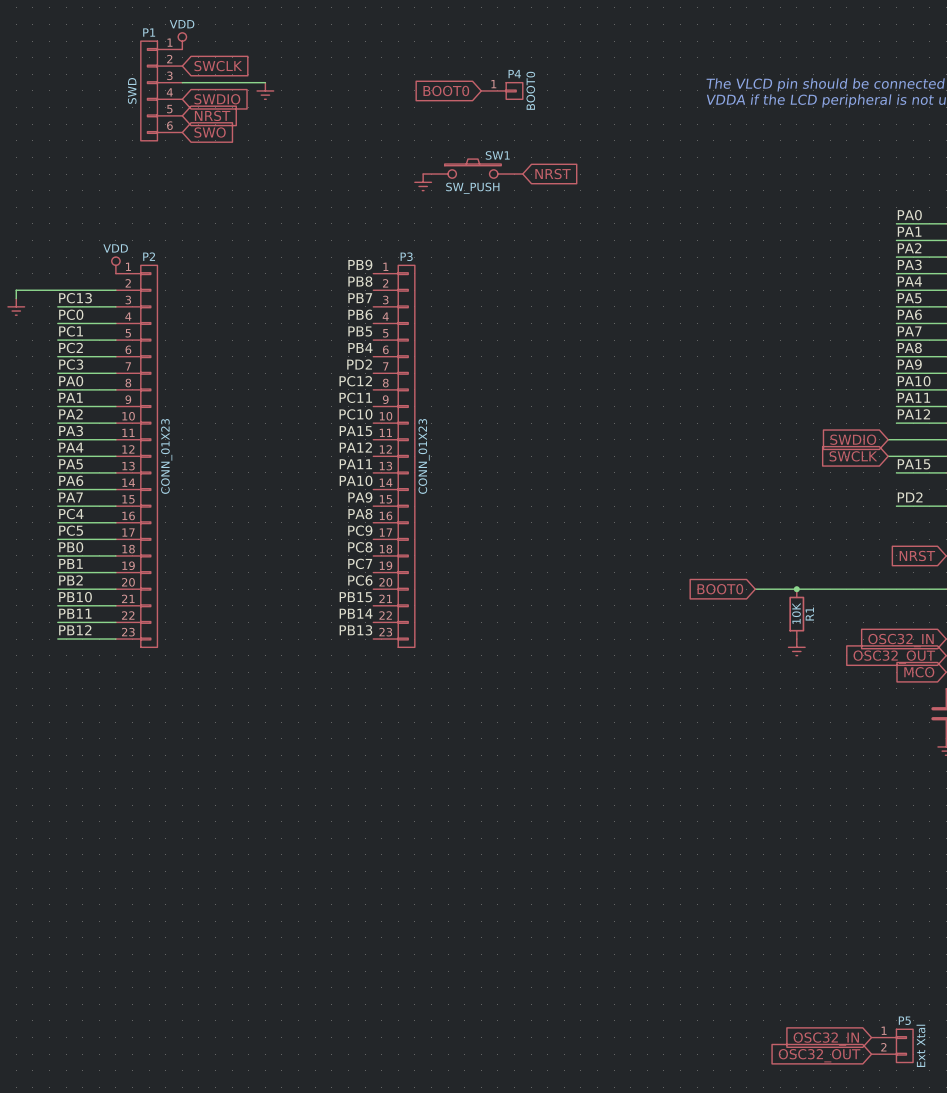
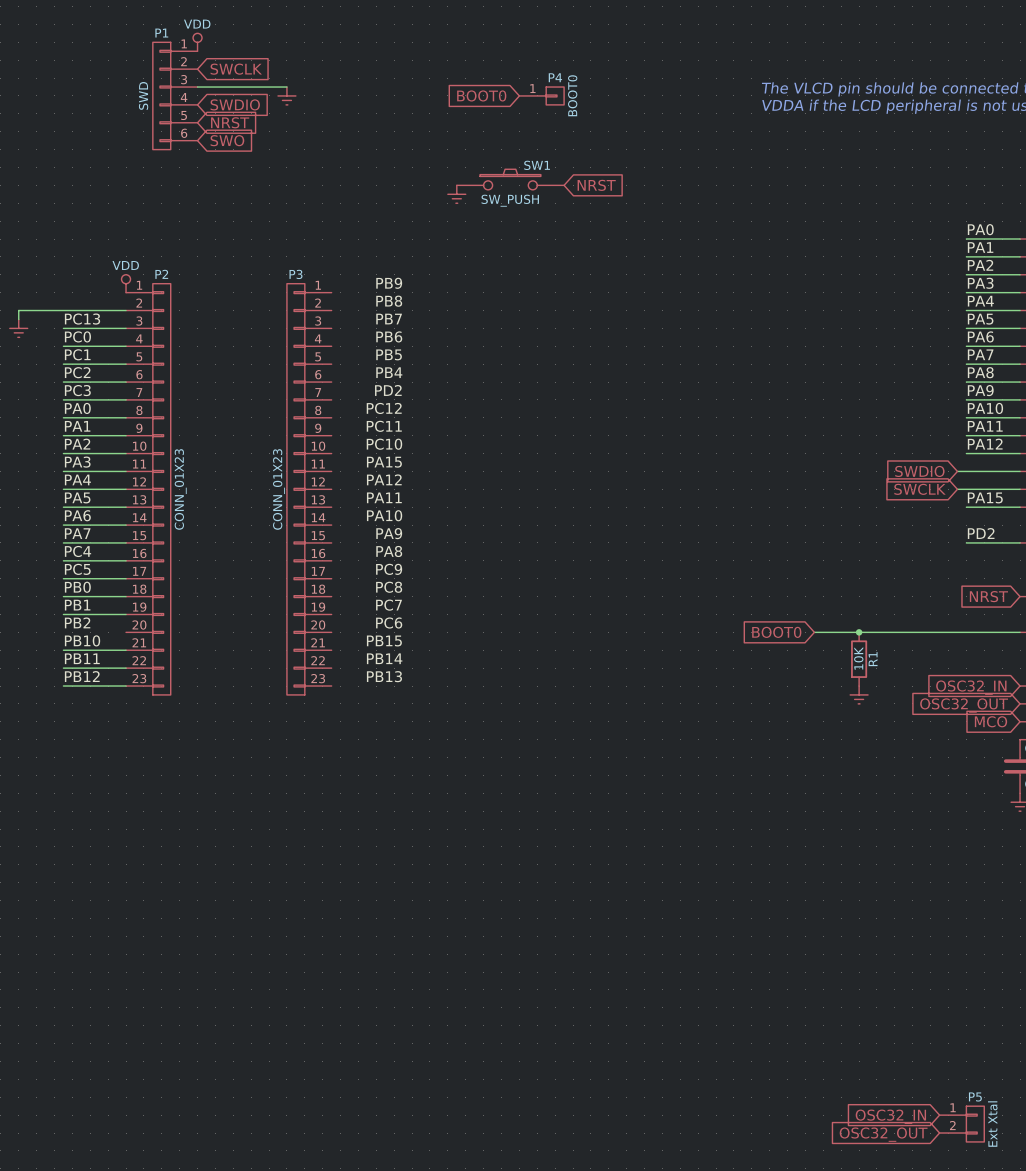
P3 flip: as is (406, 456) -> left-right (295, 489)
wire: (57, 589) (115, 589) -> none

